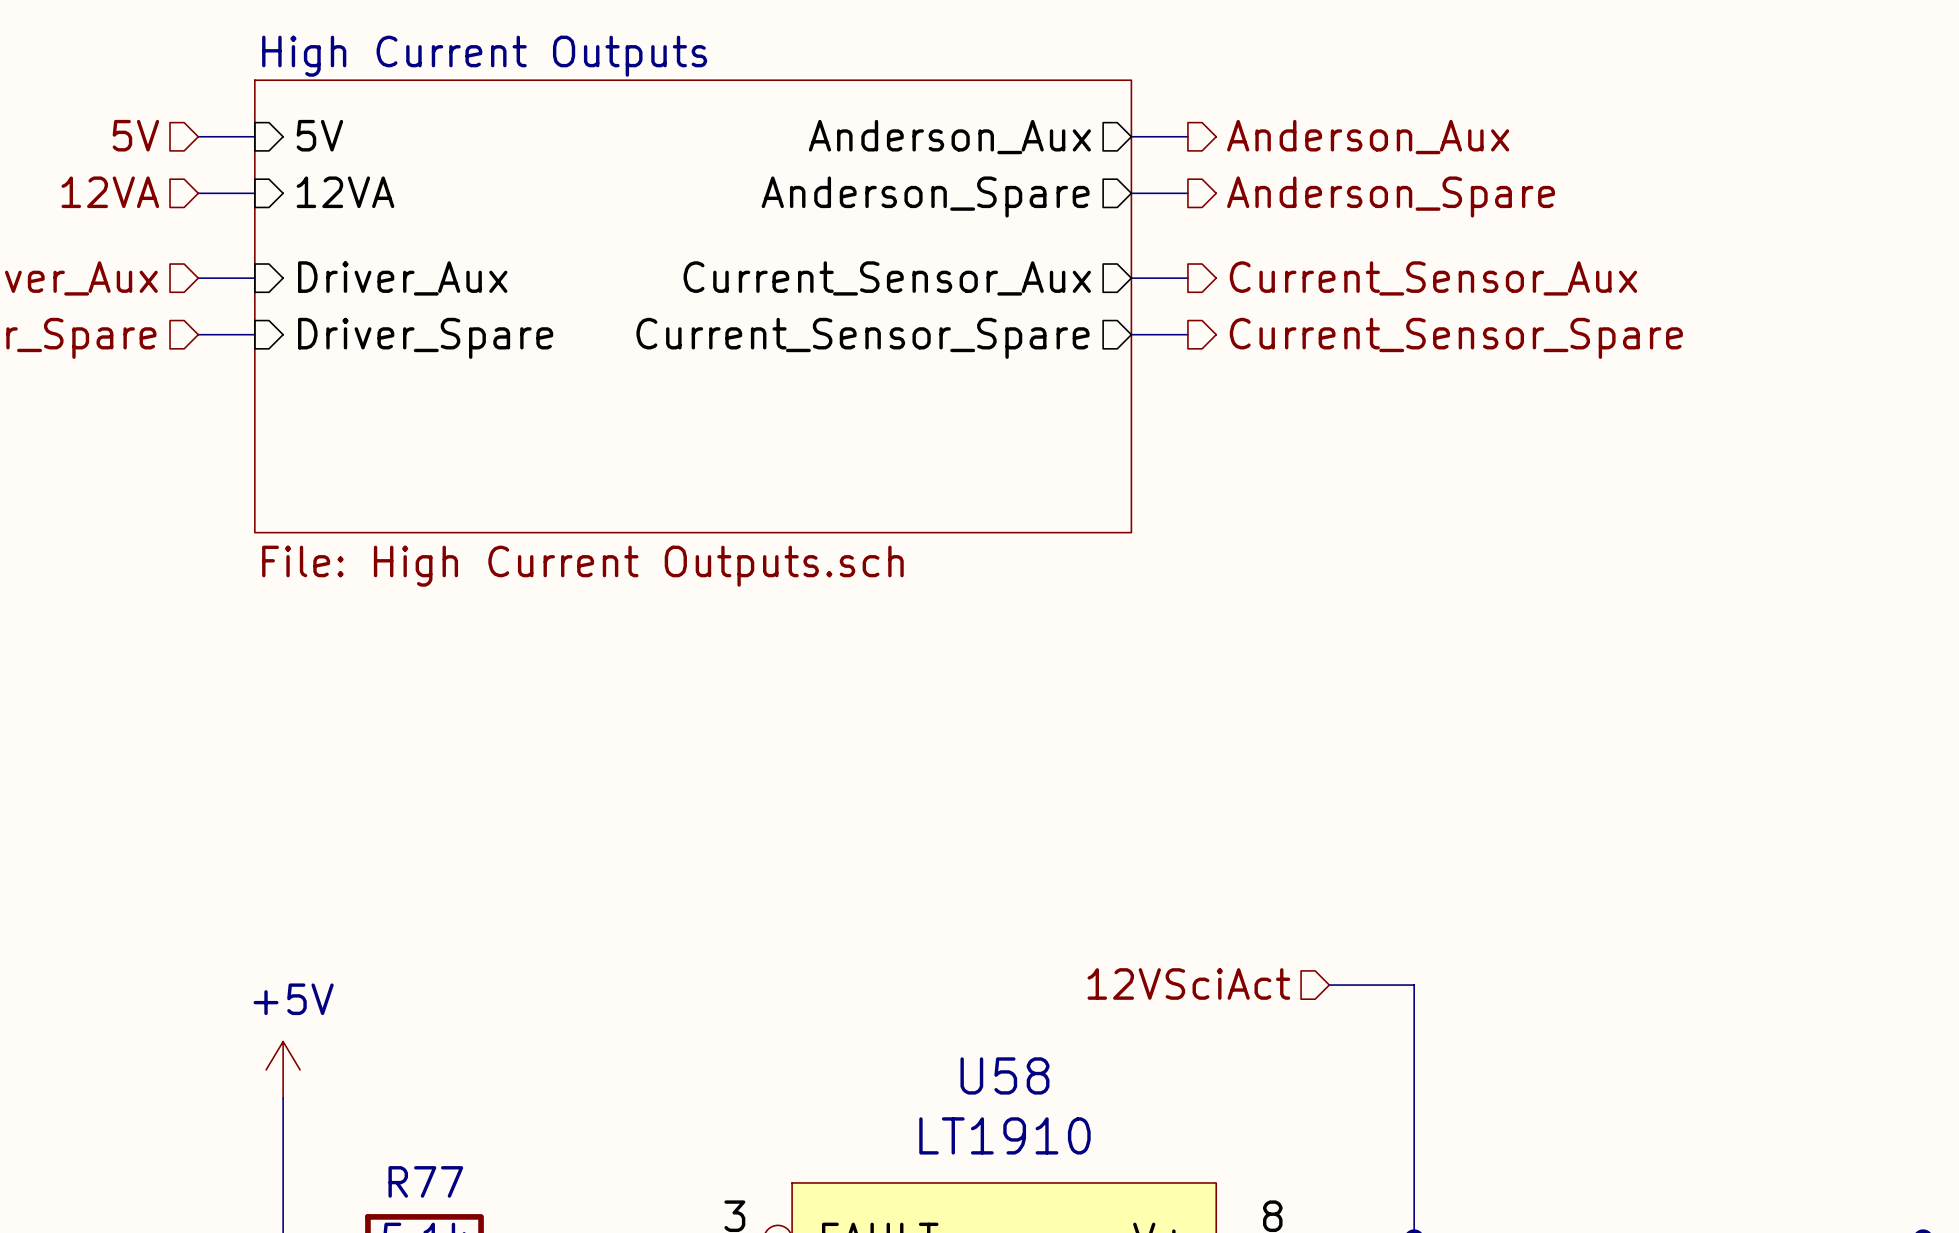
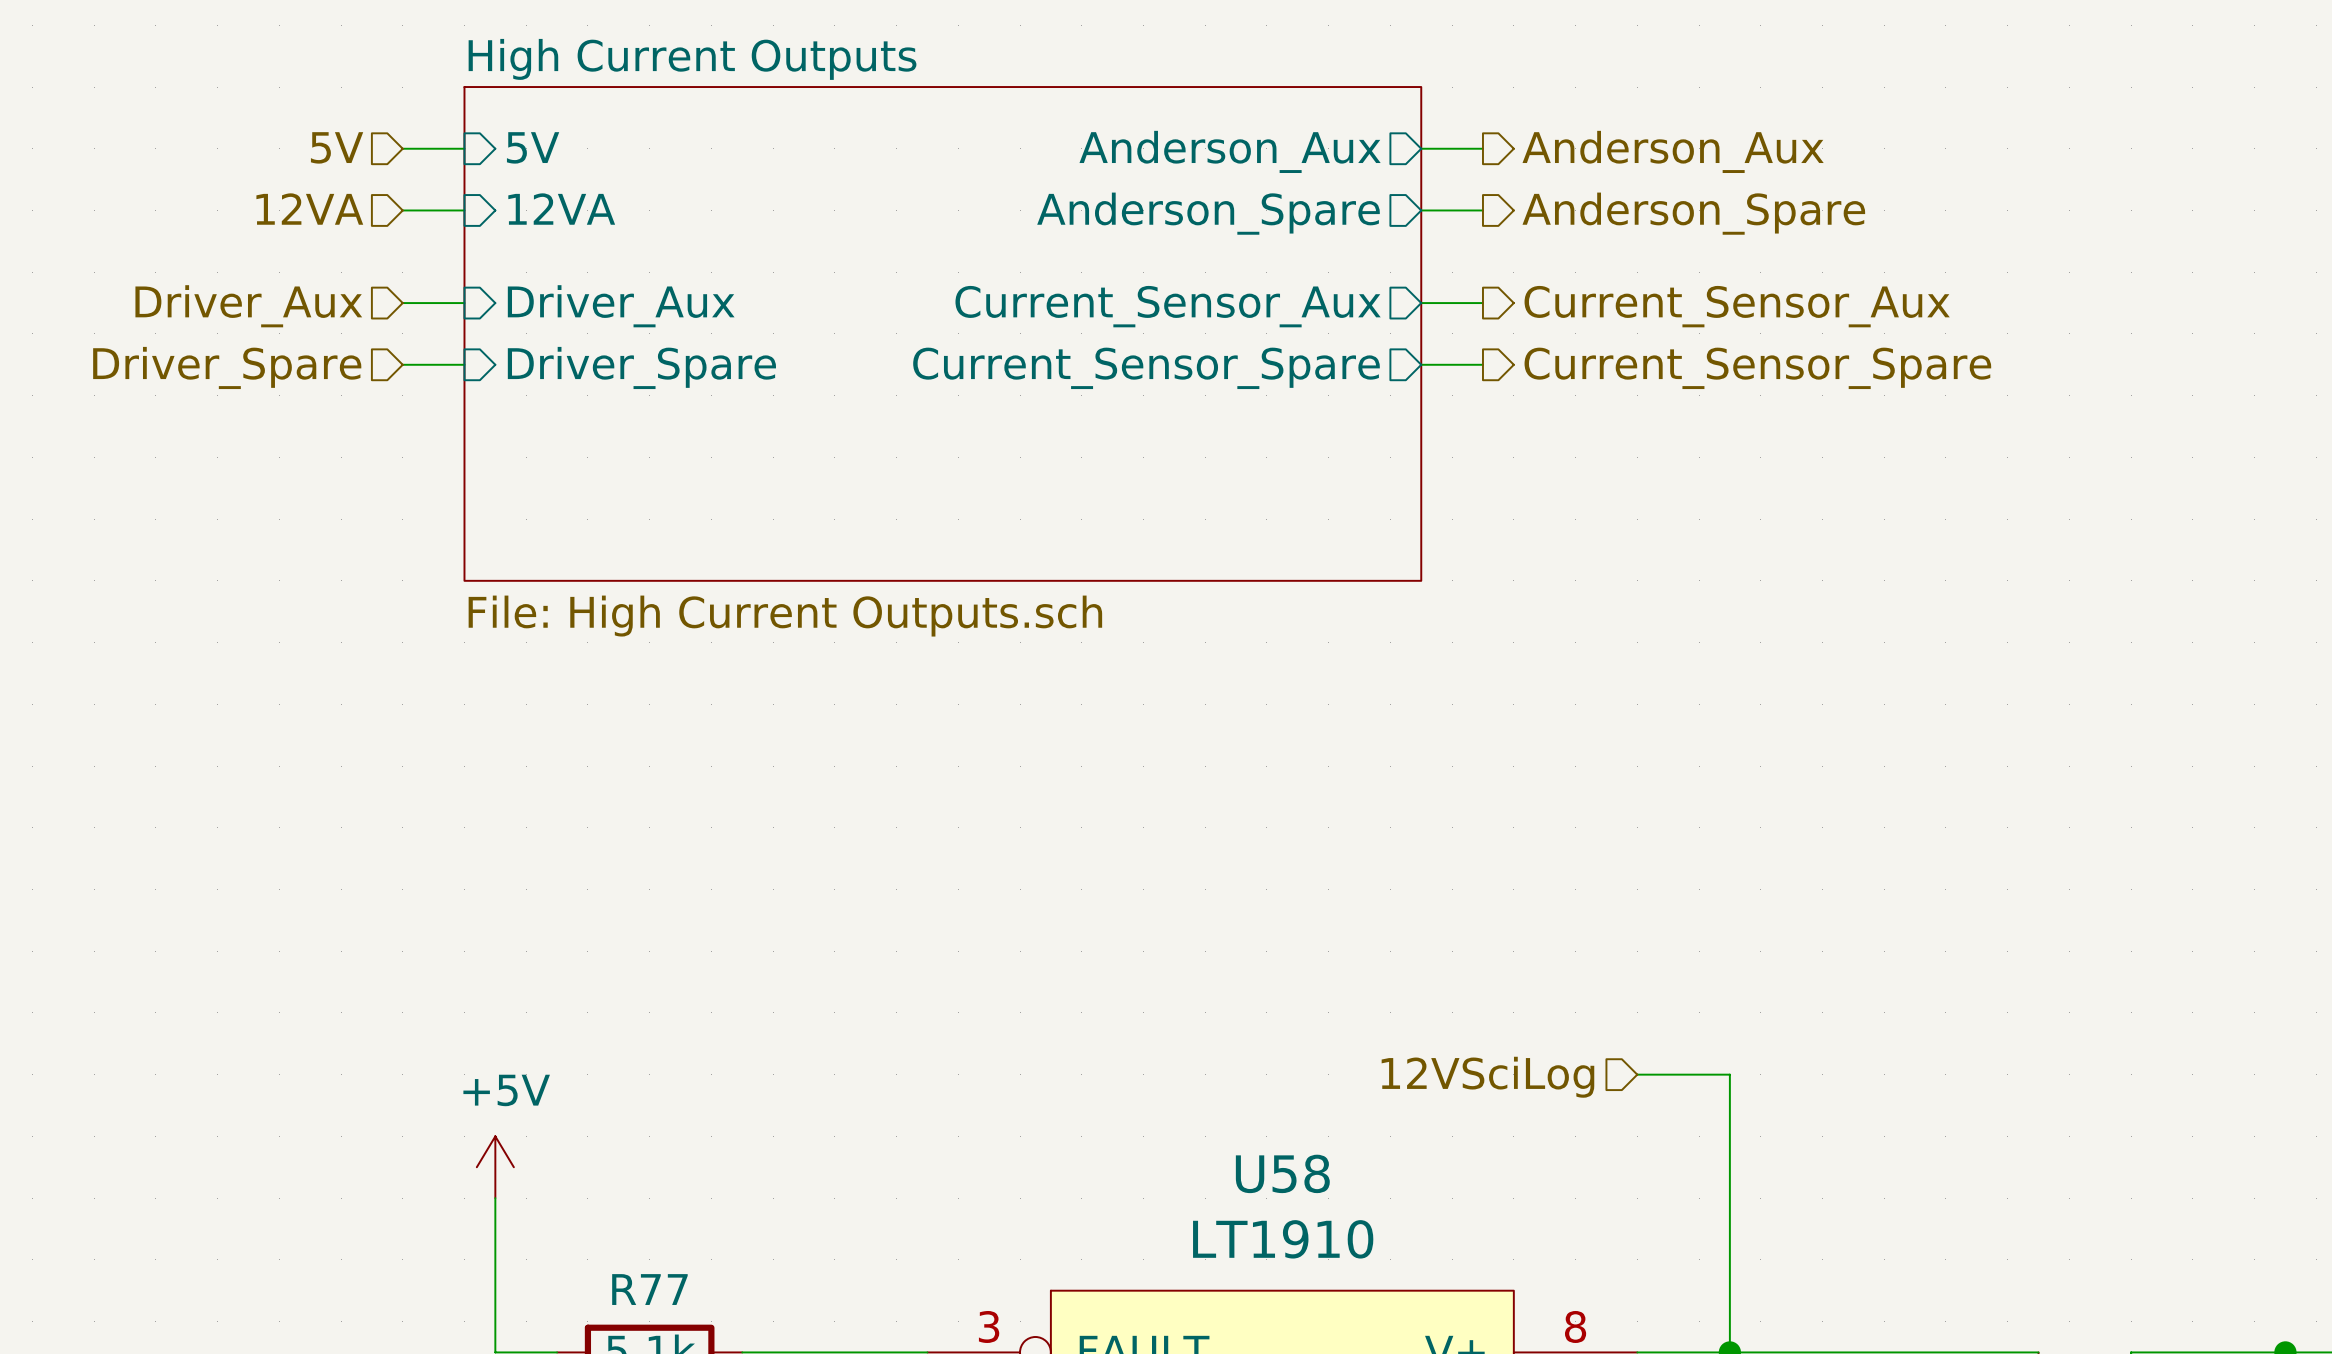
hierarchical label: 12VSciAct (1188, 983) -> 12VSciLog (1487, 1077)

